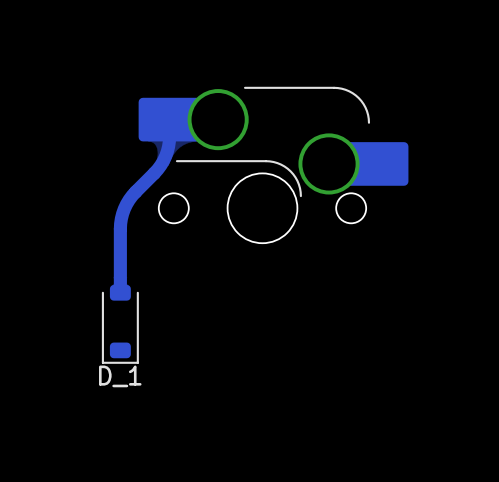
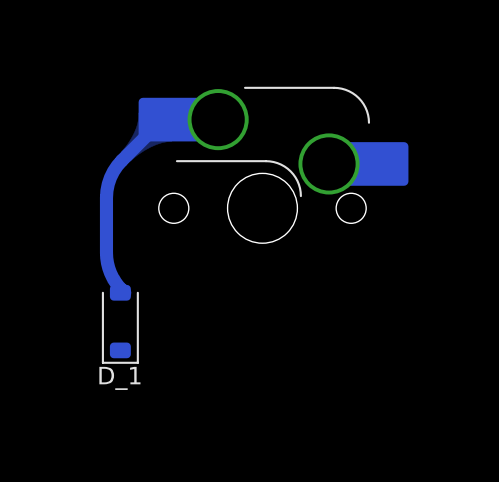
bottom track: none -> (162, 119) (117, 165) (108, 184) (106, 197) (107, 263) (112, 277) (124, 292)
bottom track: (169, 119) (168, 146) (163, 161) (132, 195) (122, 213) (120, 228) (120, 292) -> none

